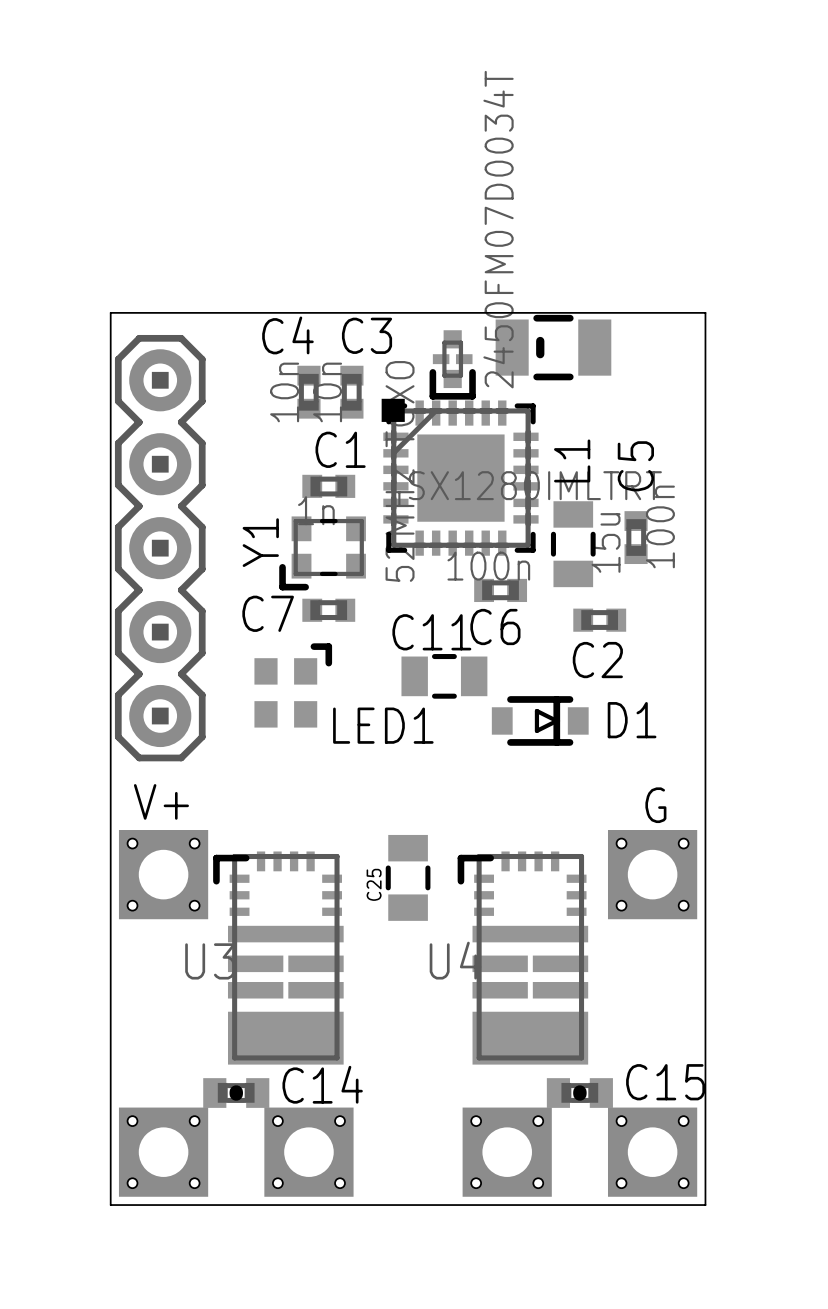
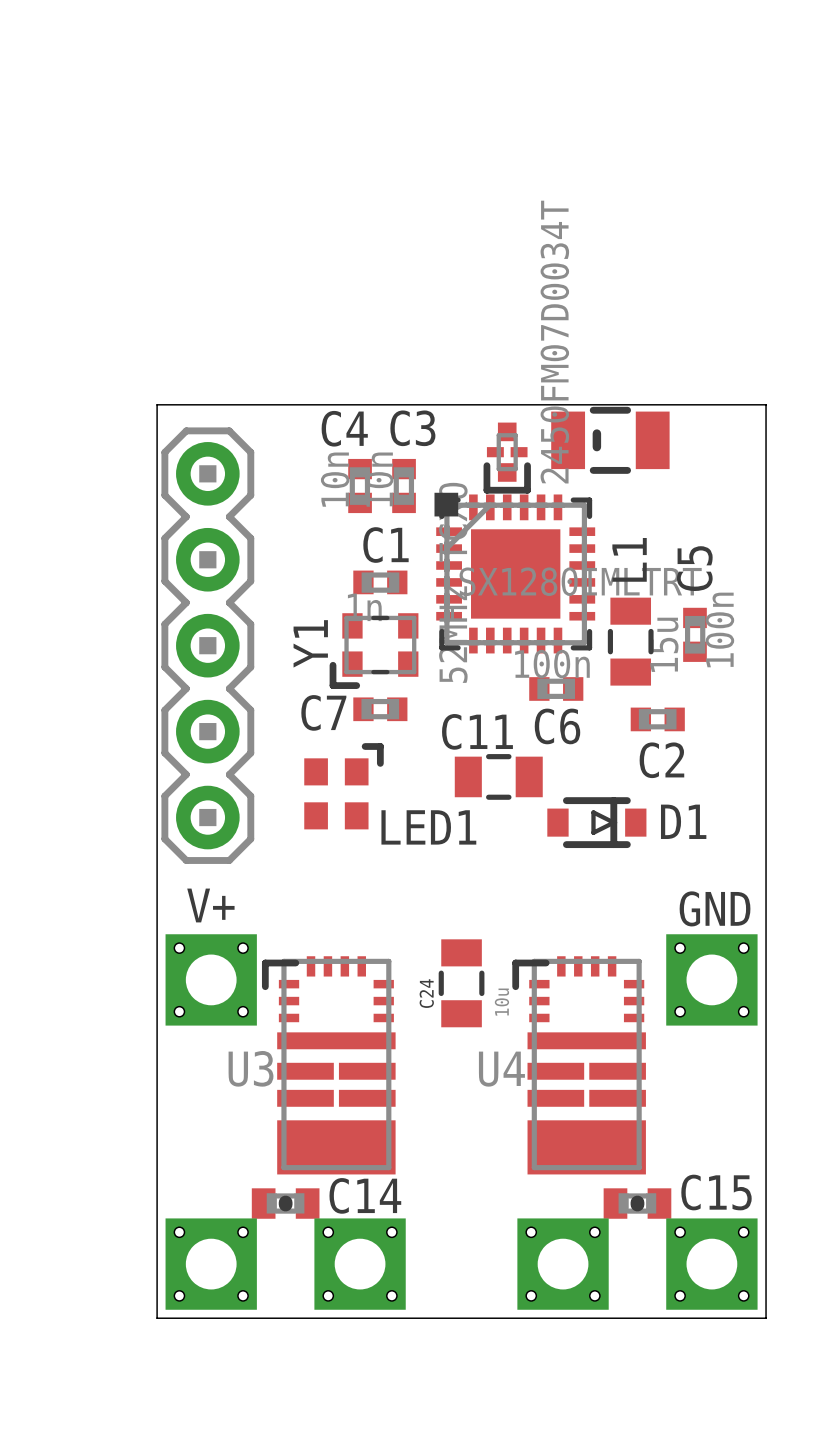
text: G (655, 805) -> GND (715, 908)
C25 name: C25 (374, 884) -> C24 (426, 993)
C25 value: none -> 10u (501, 1002)

